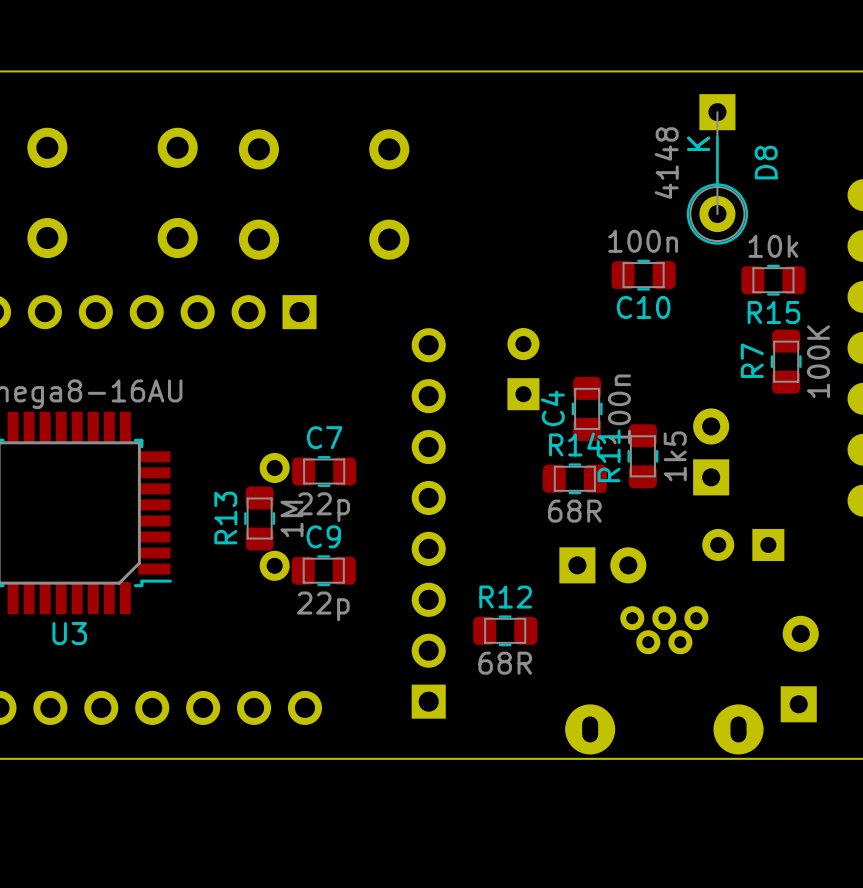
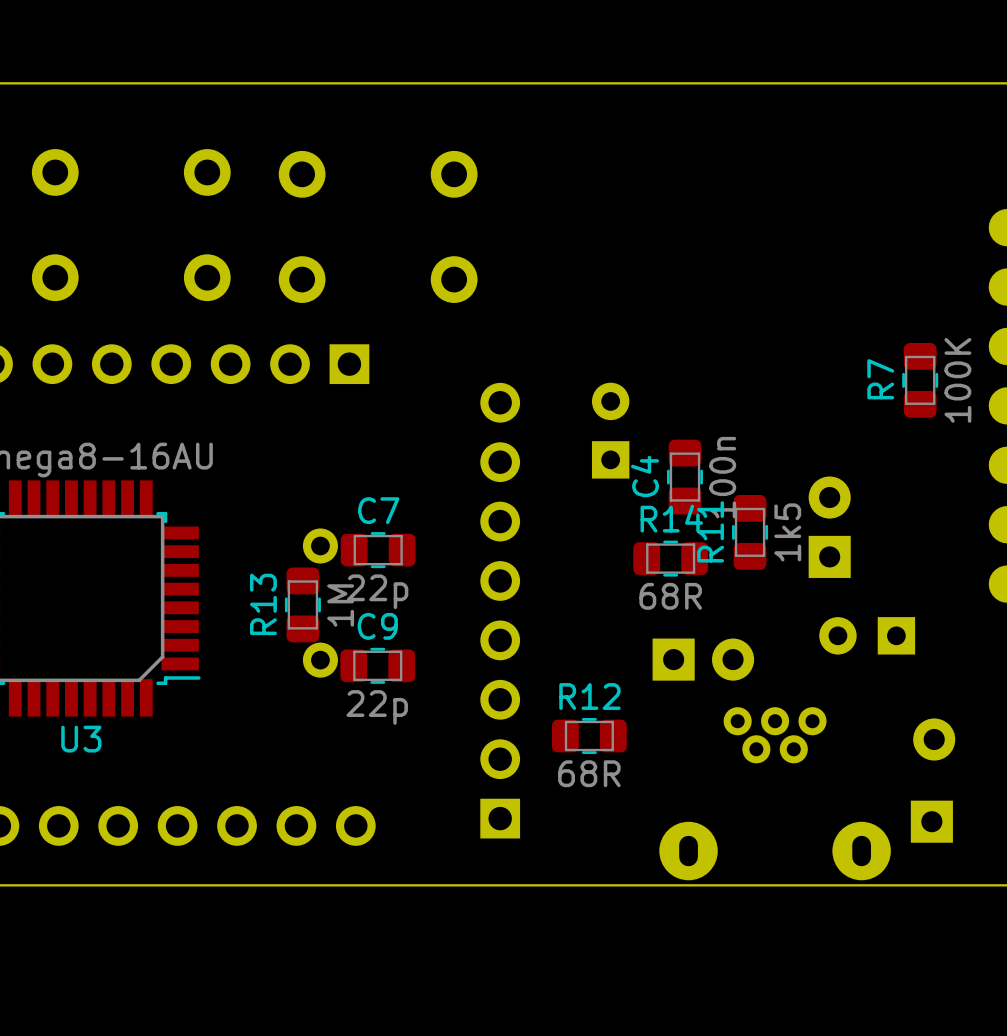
D8: 4148 (717, 169) -> none
C10: 100n (643, 275) -> none
R15: 10k (773, 280) -> none
R7 position: (786, 361) -> (920, 380)

